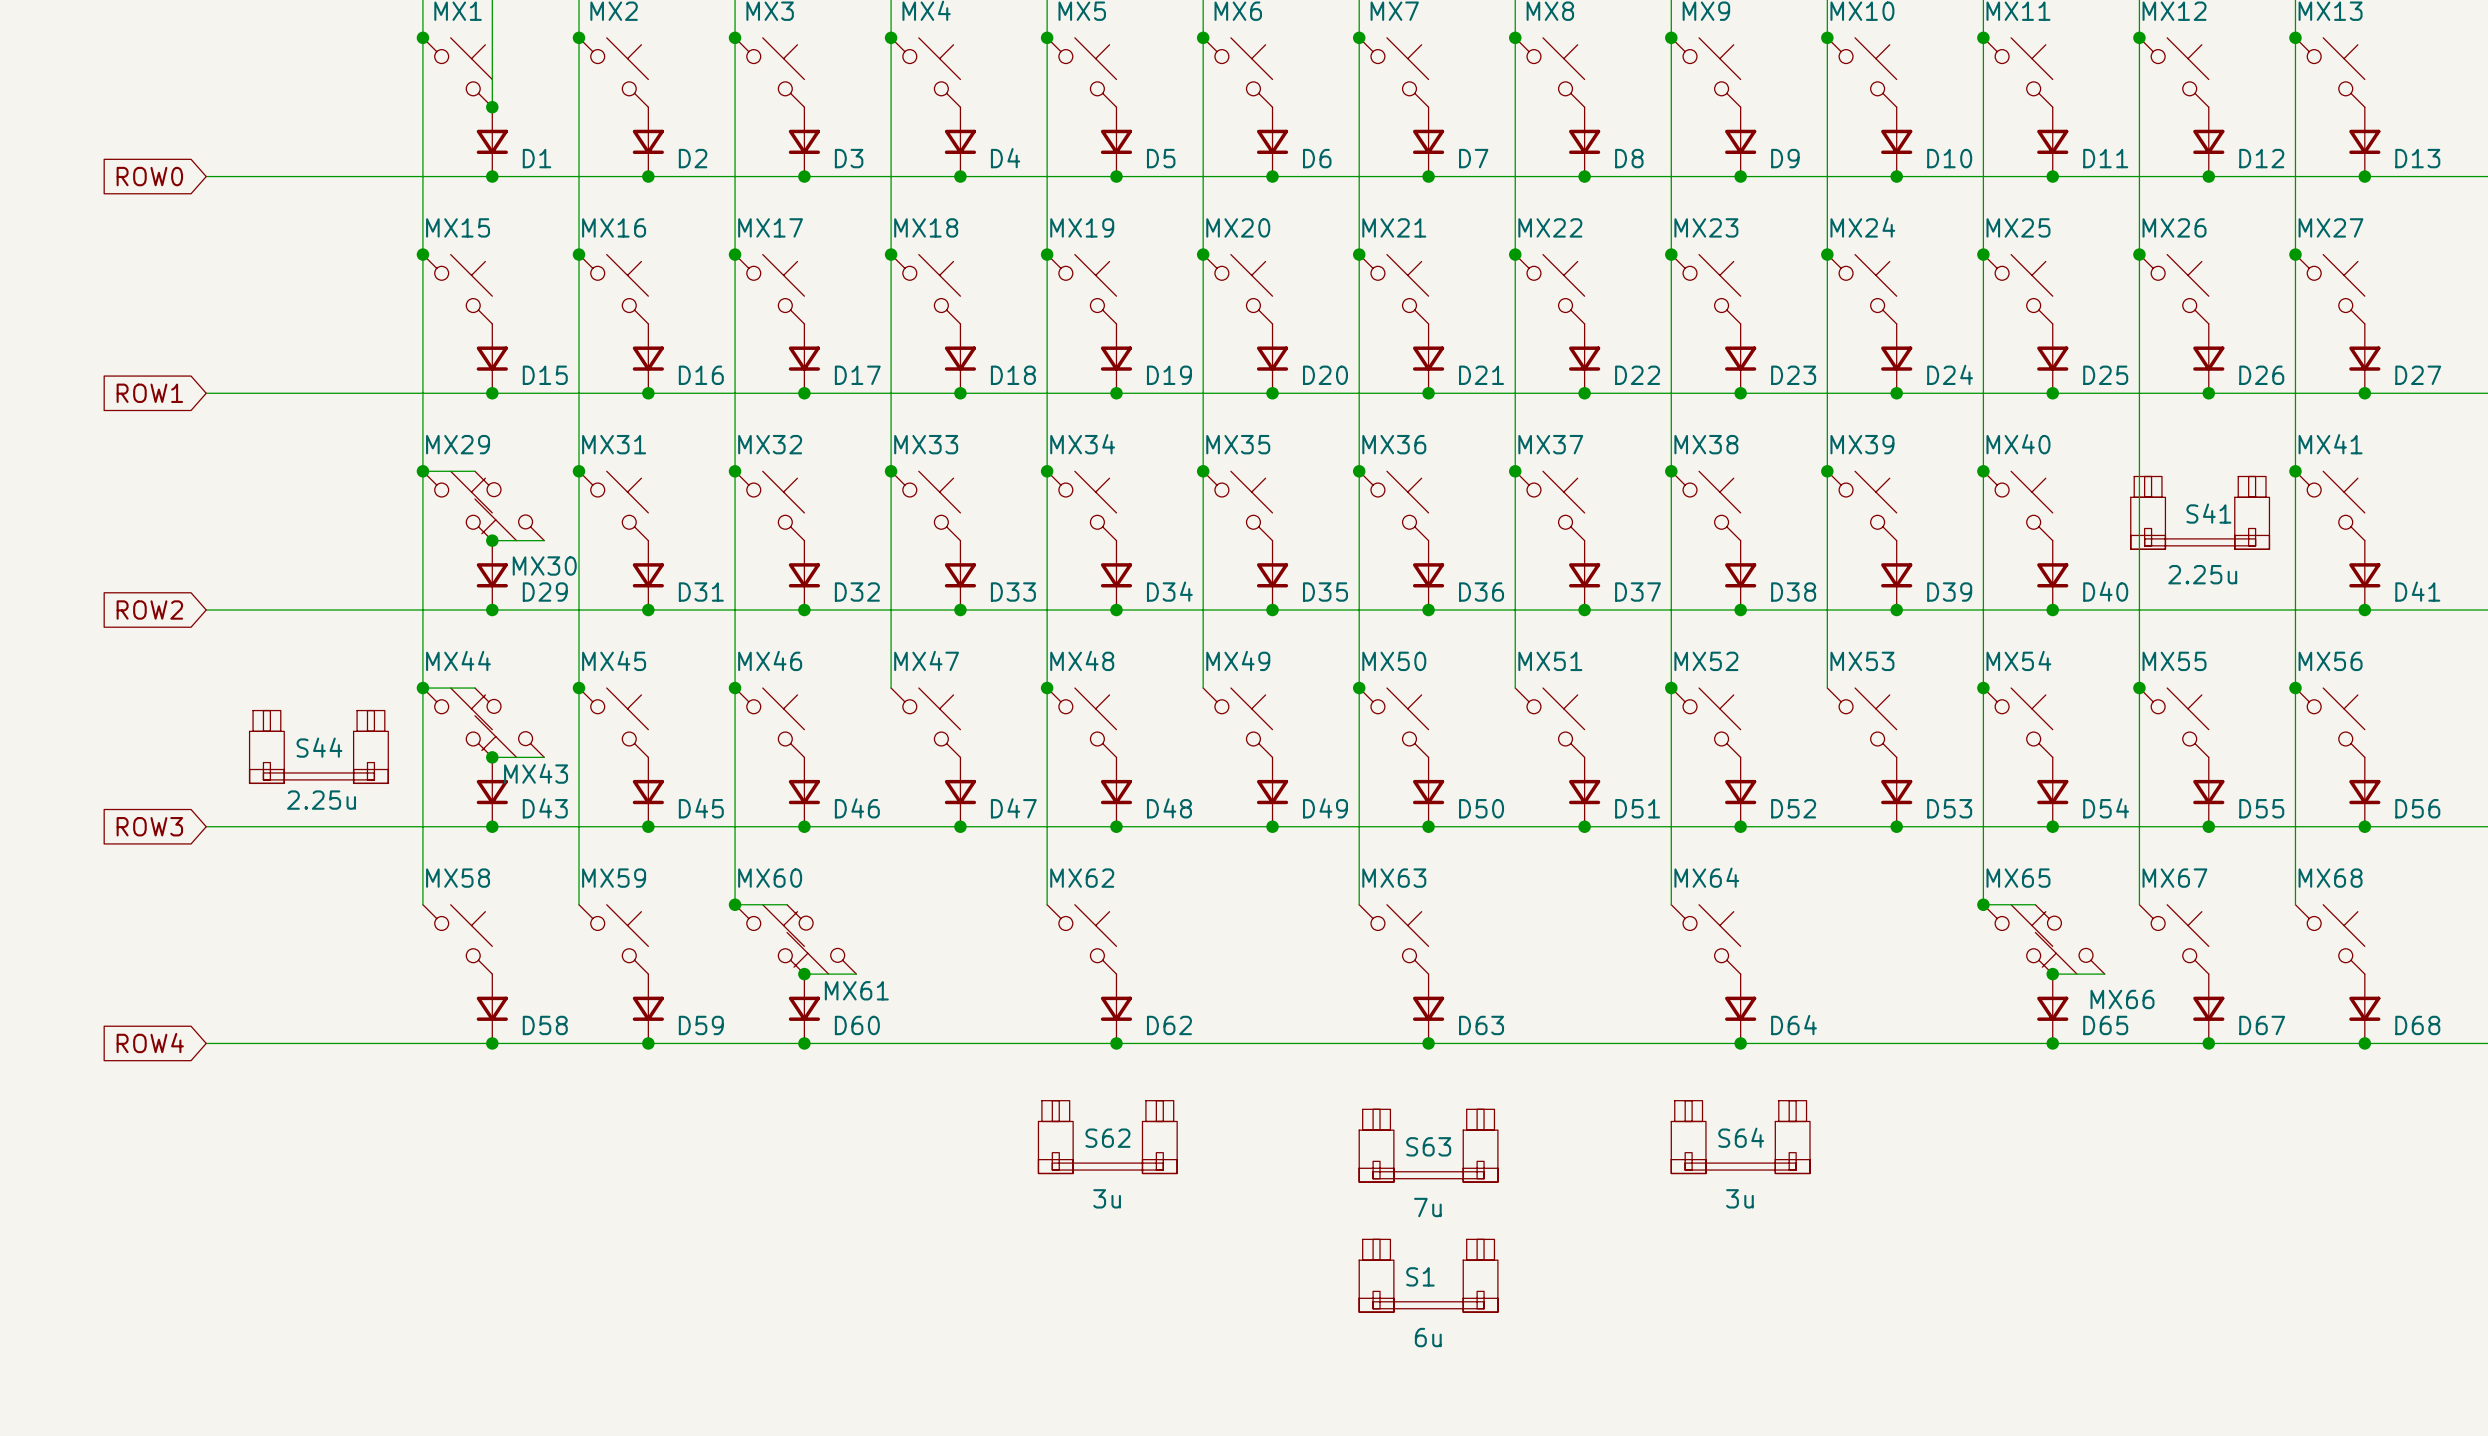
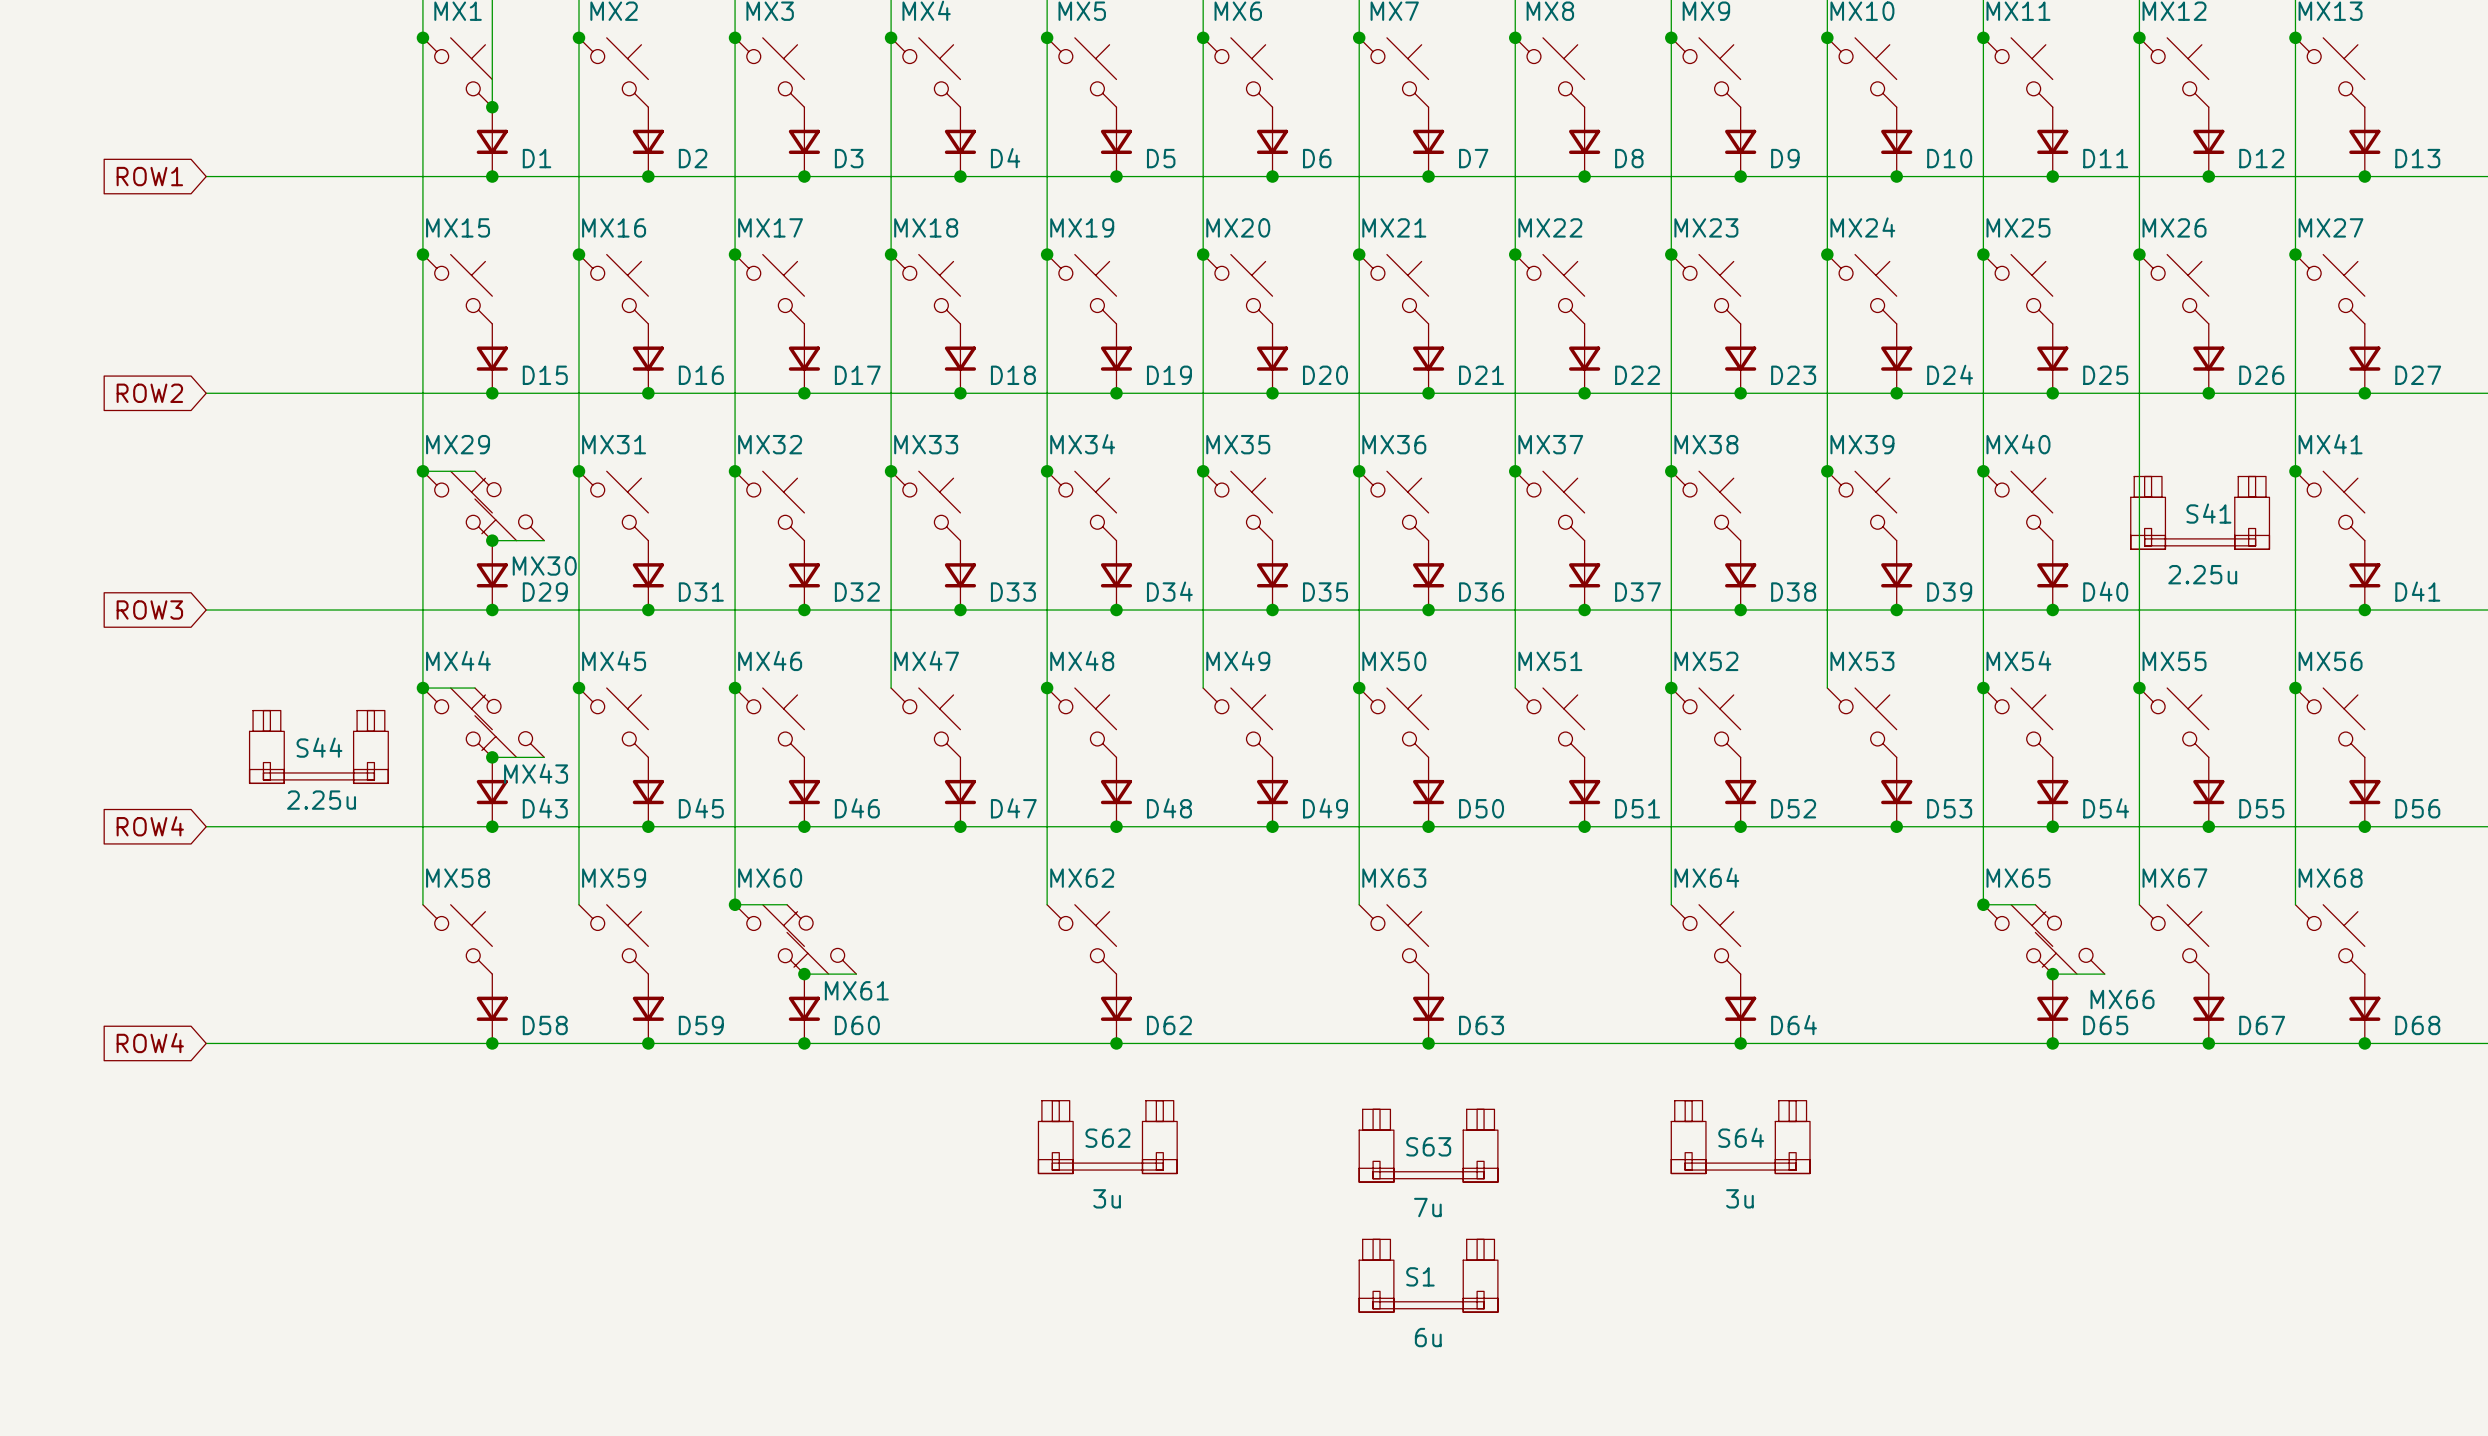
global label: ROW0 (149, 176) -> ROW1 (149, 176)
global label: ROW1 (149, 393) -> ROW2 (149, 393)
global label: ROW2 (149, 610) -> ROW3 (149, 610)
global label: ROW3 (149, 826) -> ROW4 (150, 826)

